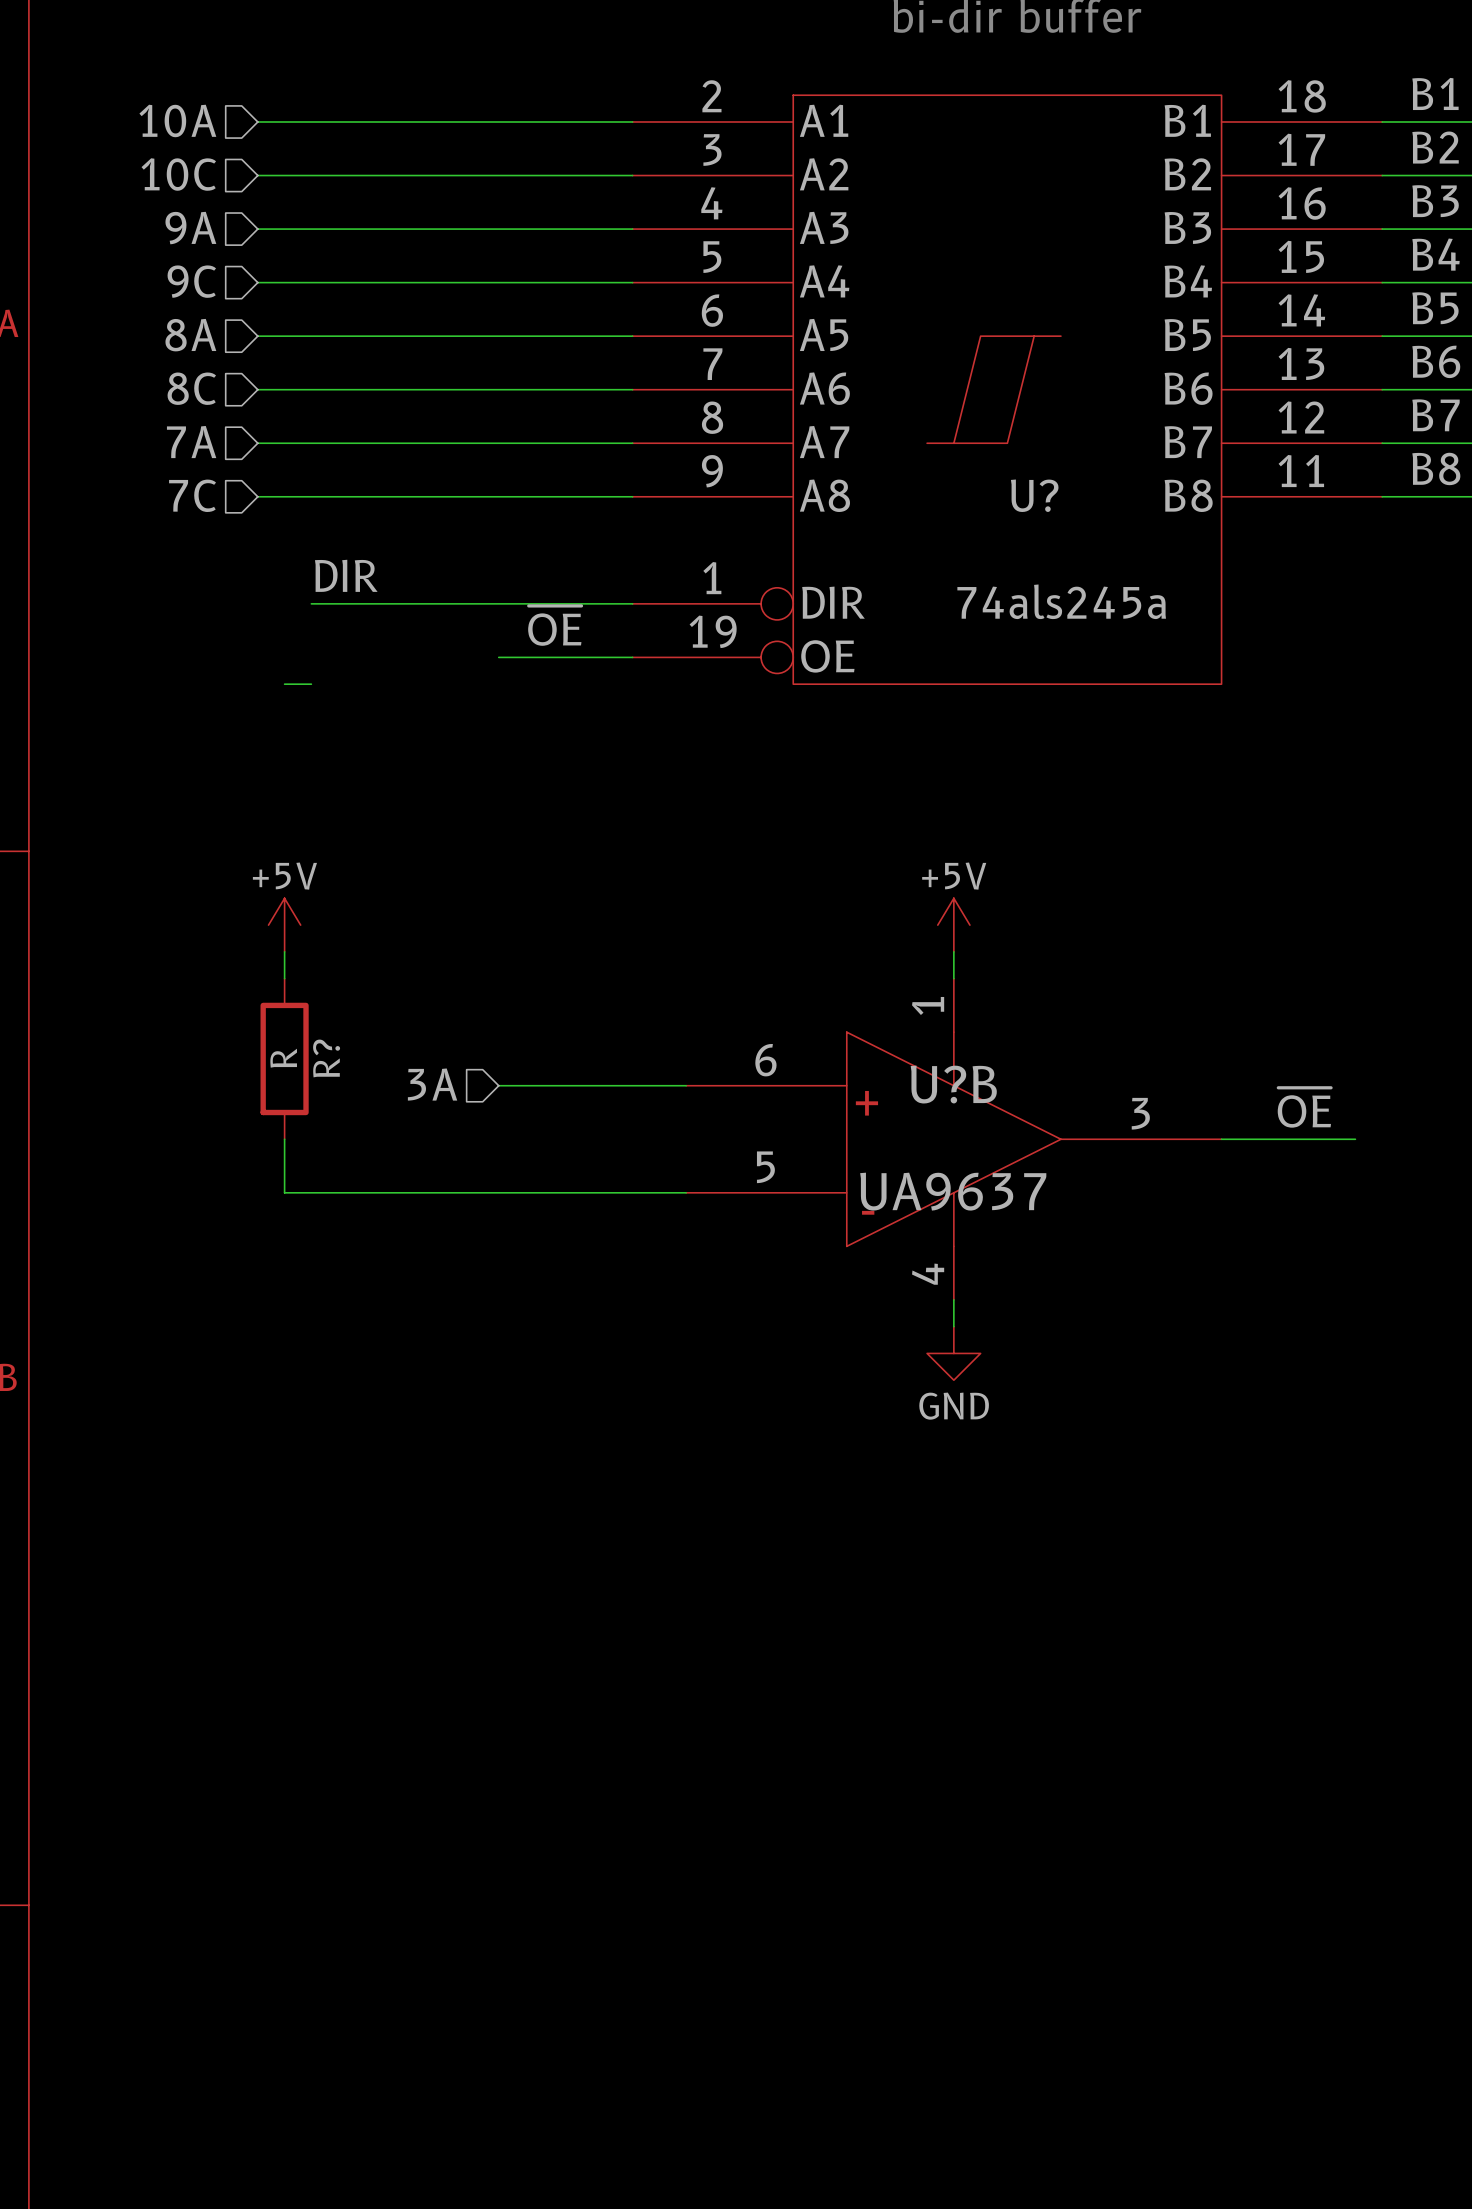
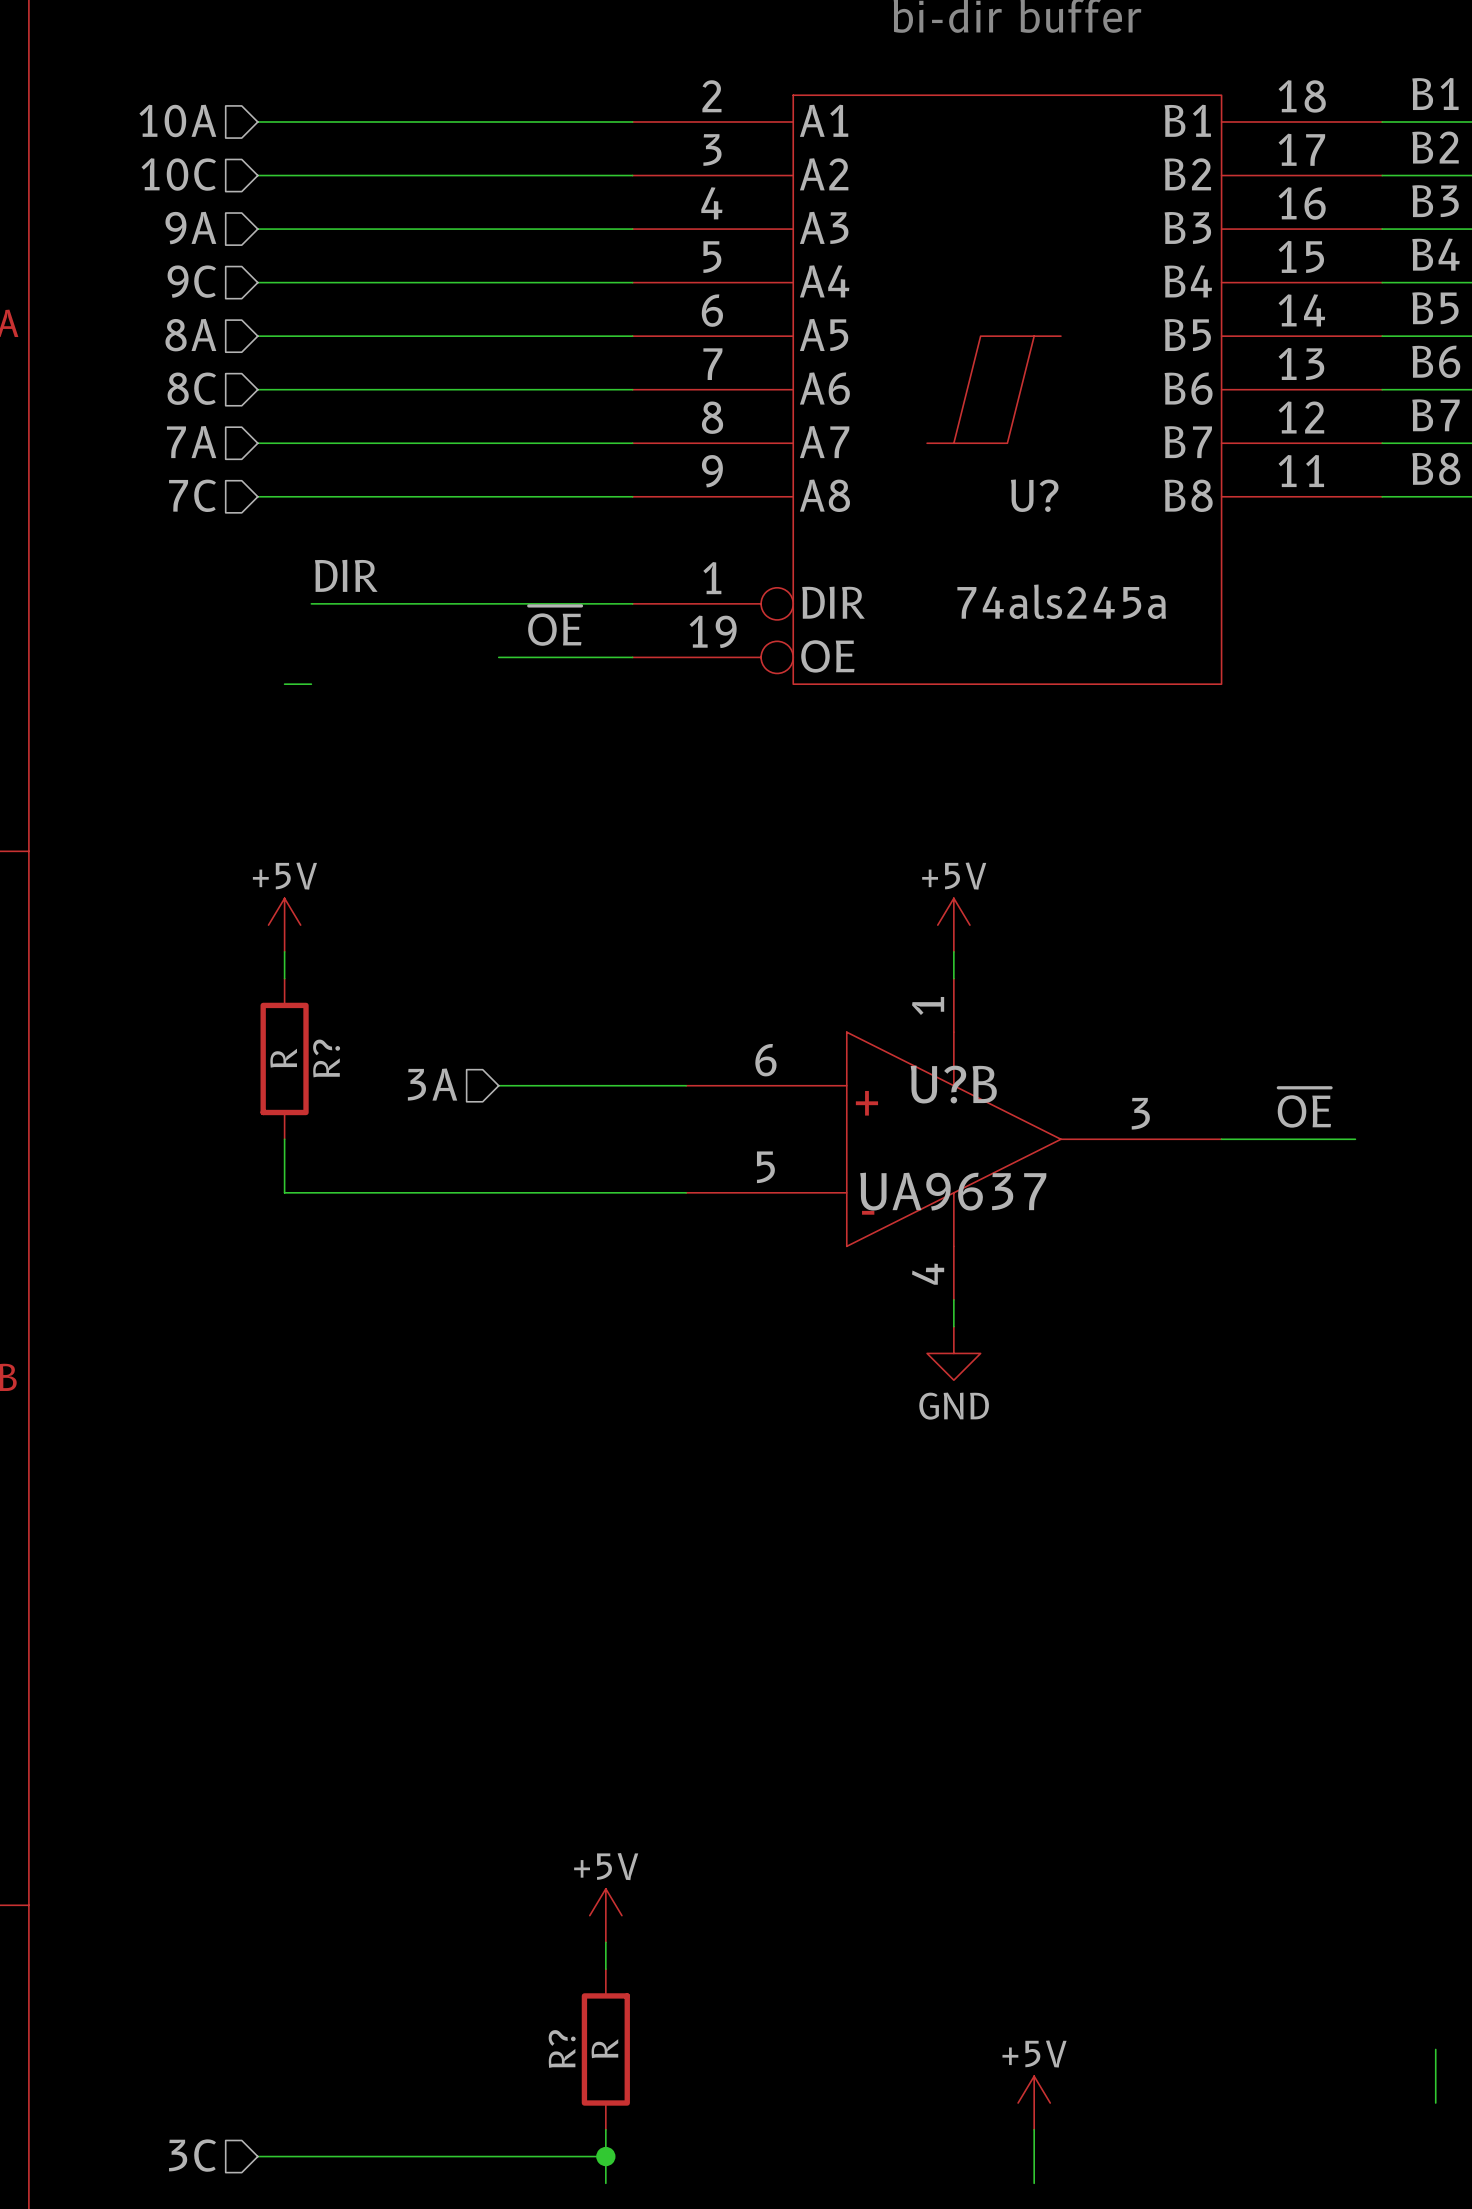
power symbol: none -> +5V (605, 1915)
wire: none -> (605, 1942) (605, 1969)
R?: none -> R (605, 2049)
wire: none -> (1435, 2049) (1435, 2103)
power symbol: none -> +5V (1034, 2103)
wire: none -> (605, 2129) (605, 2183)
wire: none -> (1034, 2129) (1034, 2183)
hierarchical label: none -> 3C (192, 2155)
wire: none -> (257, 2156) (605, 2156)
junction: none -> (605, 2156)

